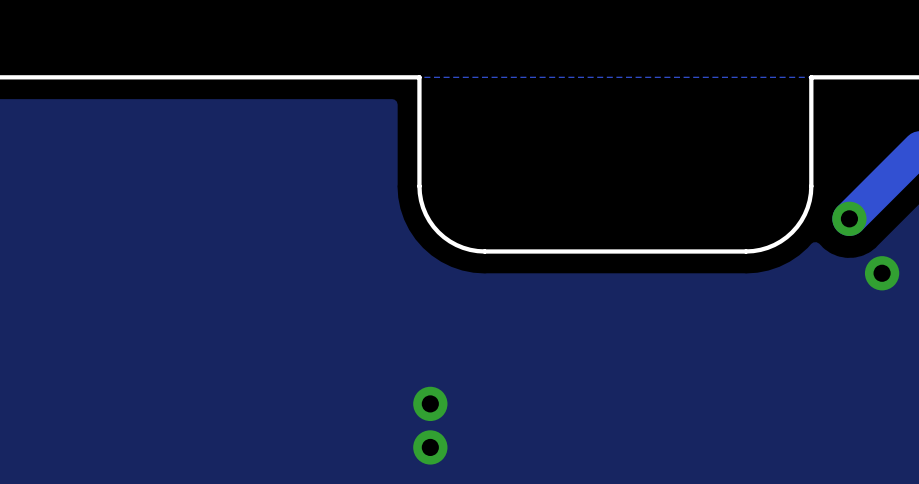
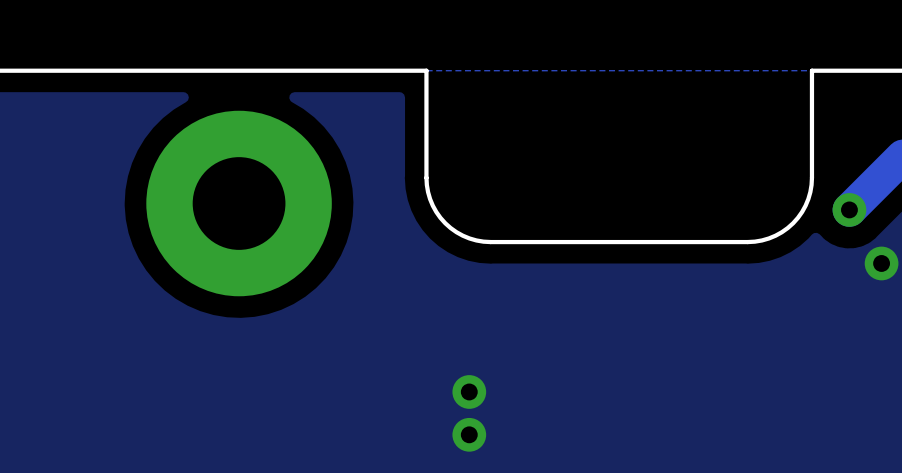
part: none -> (239, 203)
via position: (430, 403) -> (469, 391)
via position: (430, 447) -> (469, 434)

